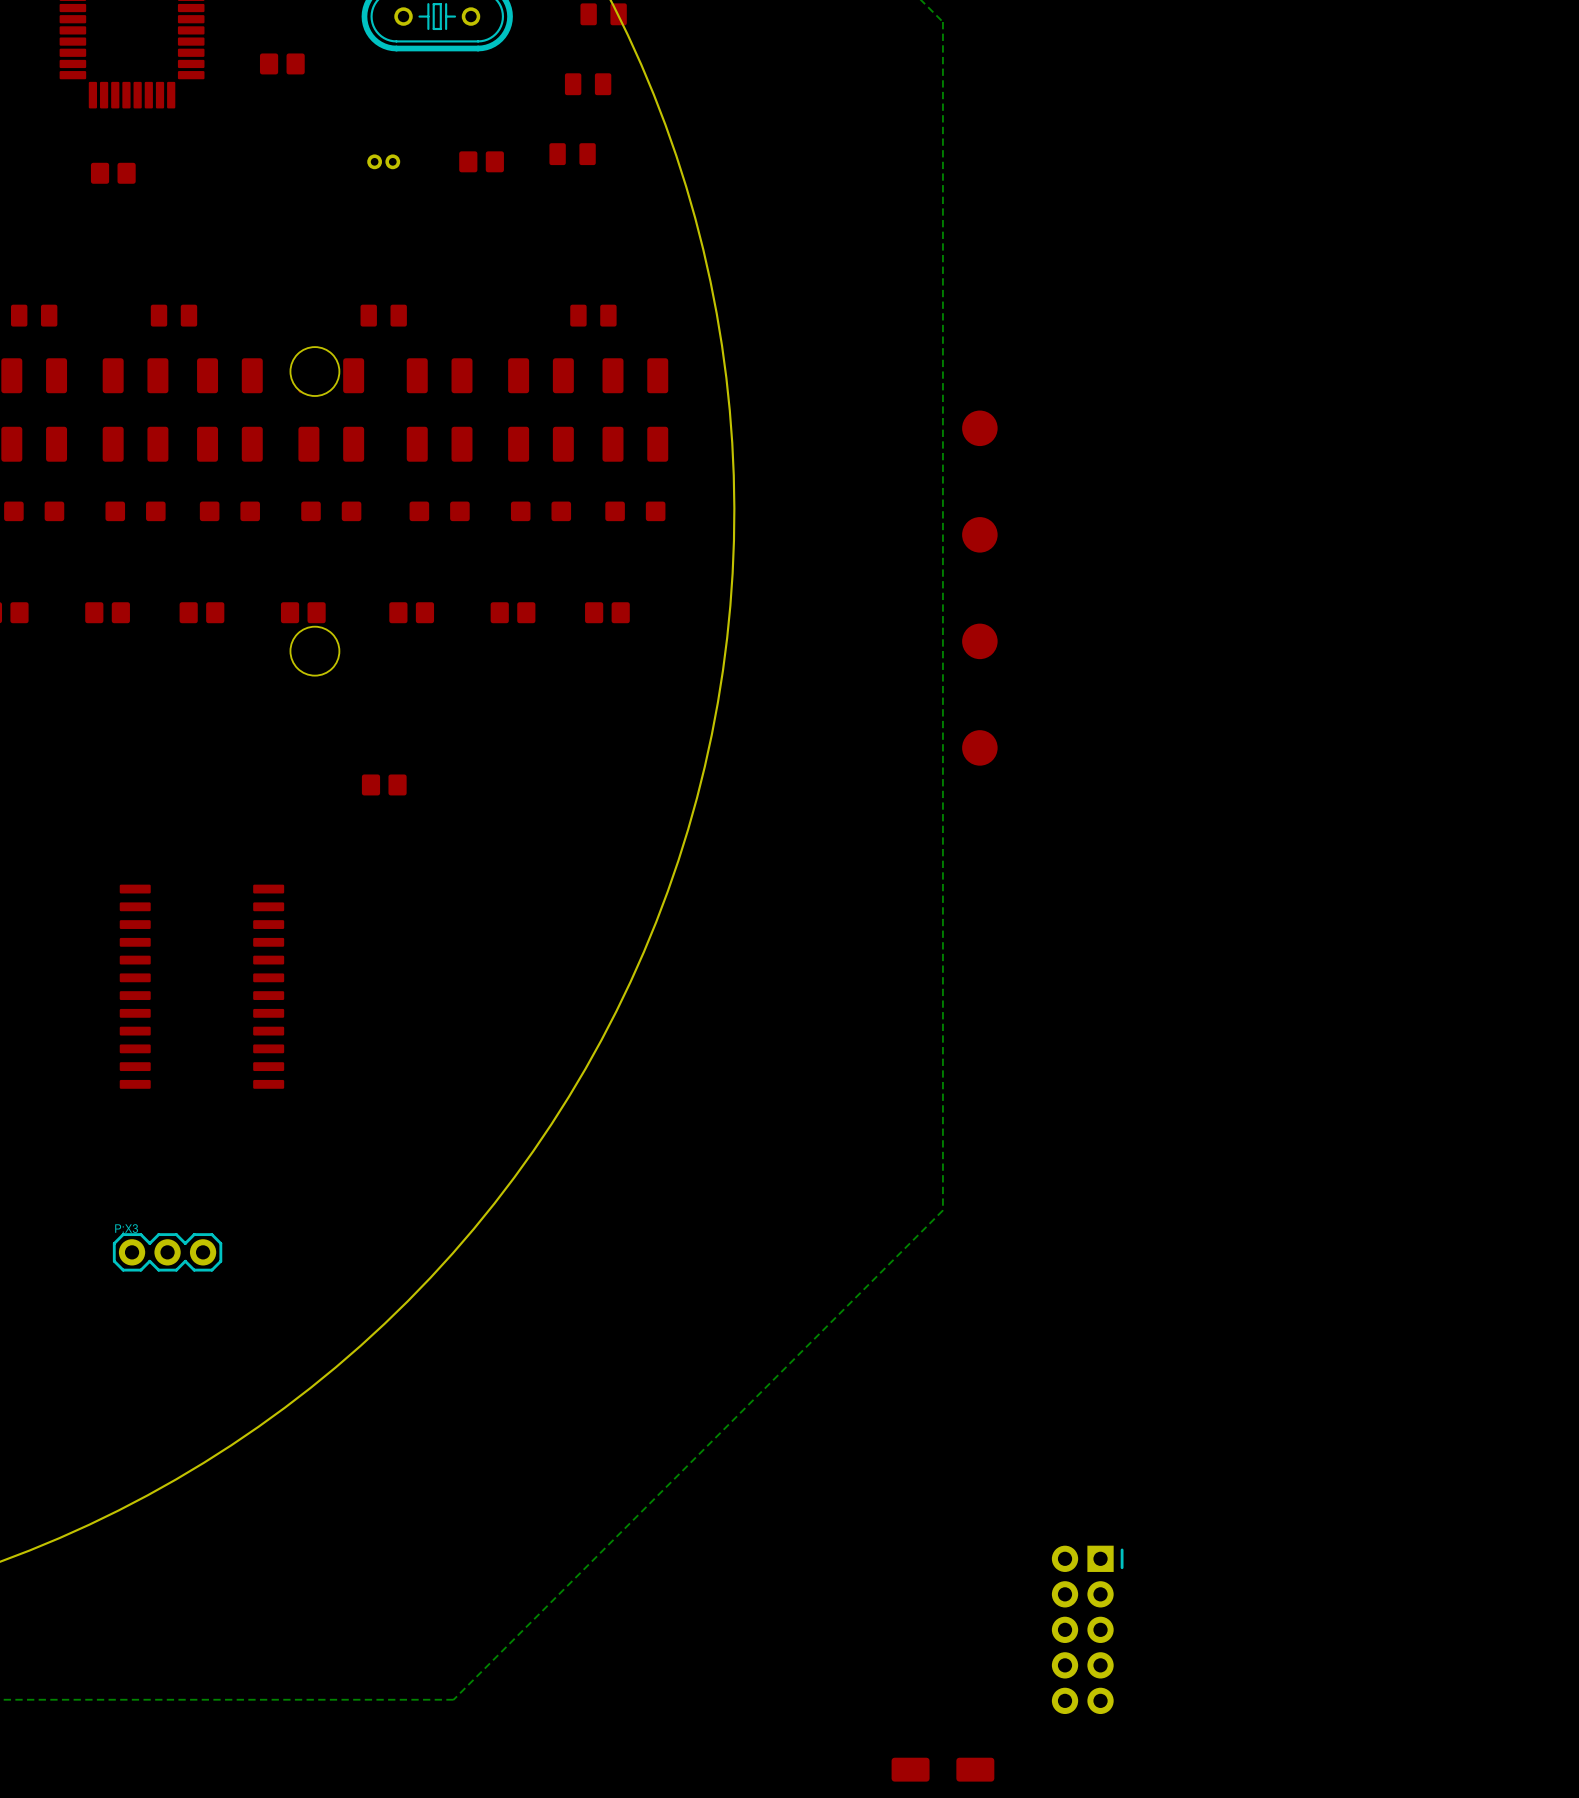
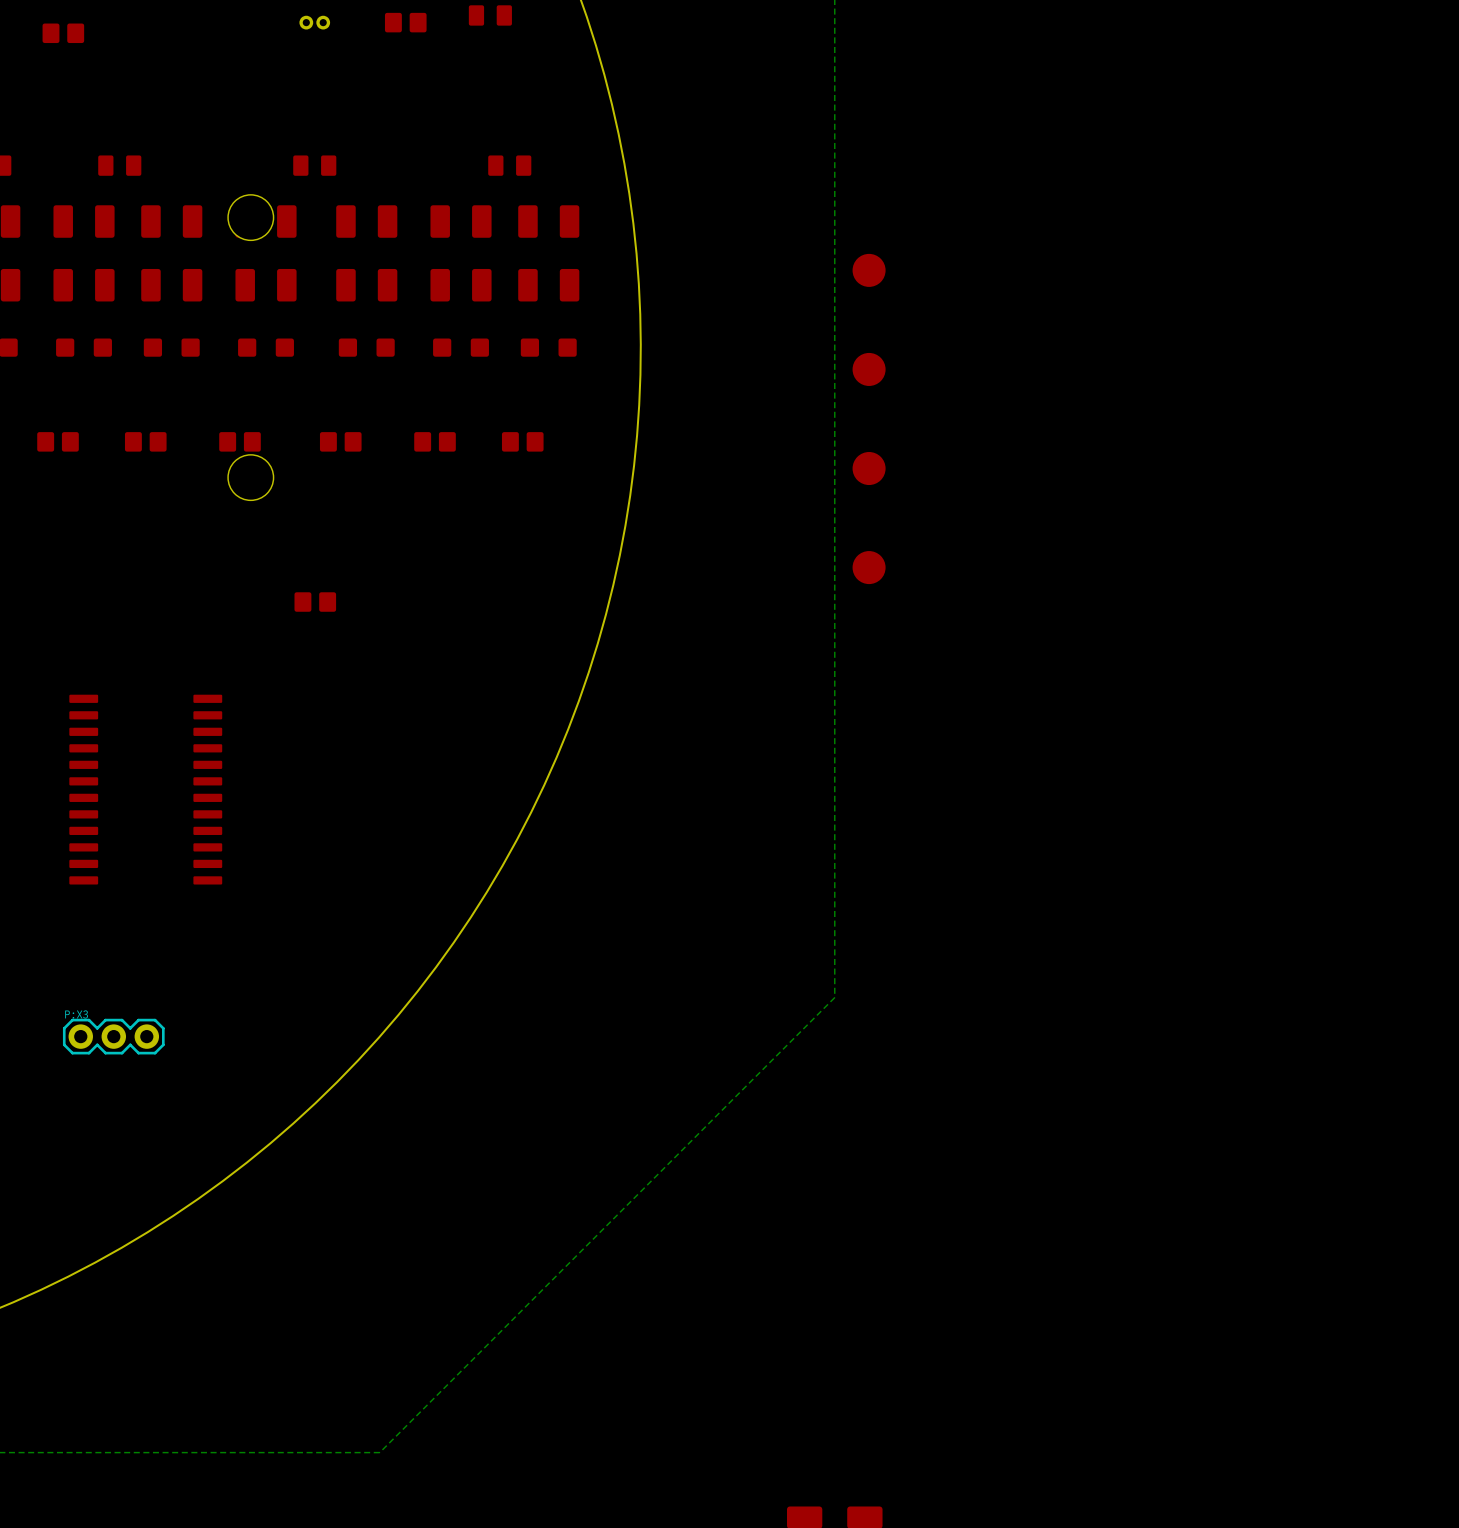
part: (1087, 1629) -> none

